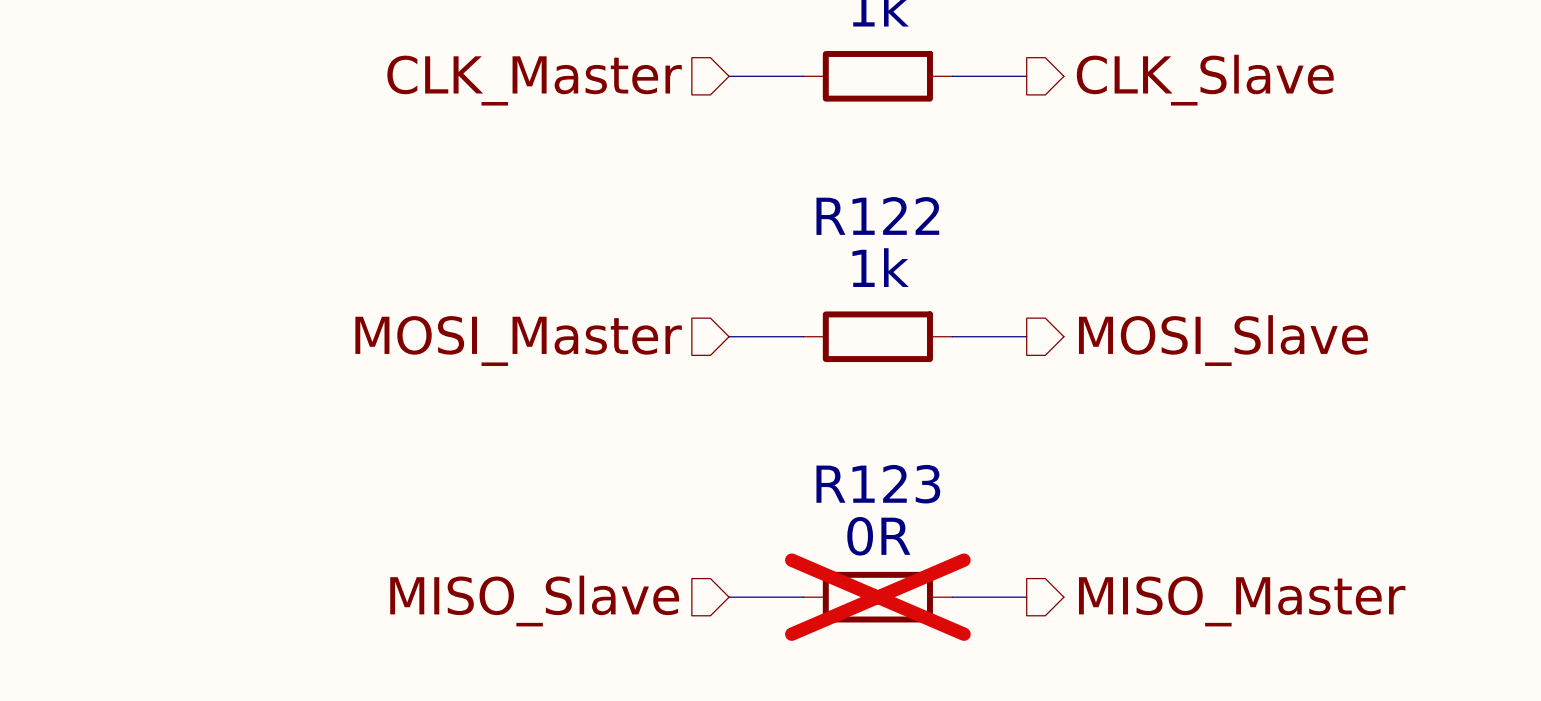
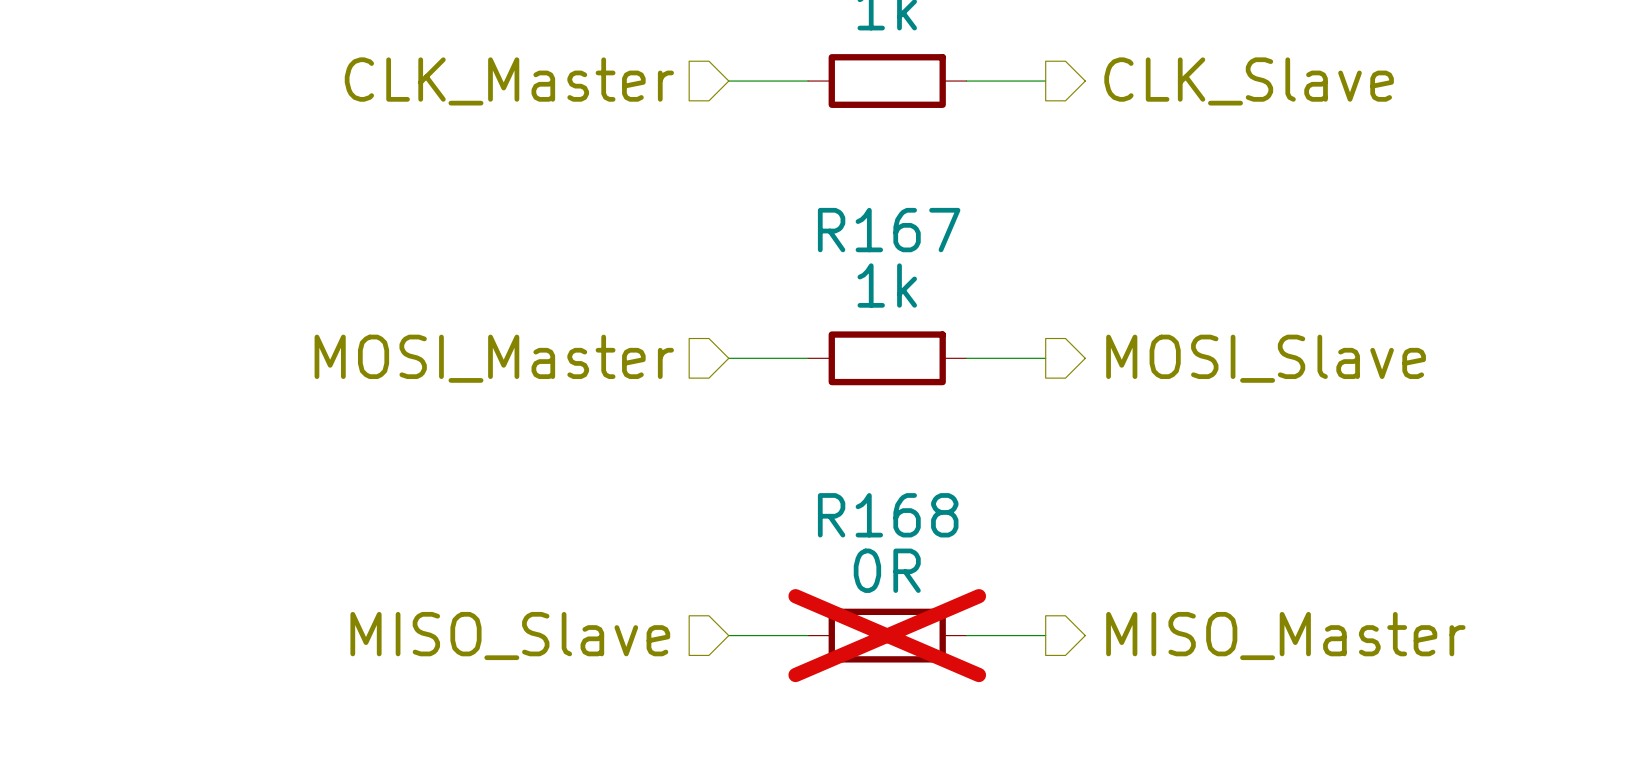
R122 name: R122 (877, 215) -> R167 (889, 230)
R123 name: R123 (878, 484) -> R168 (888, 515)

